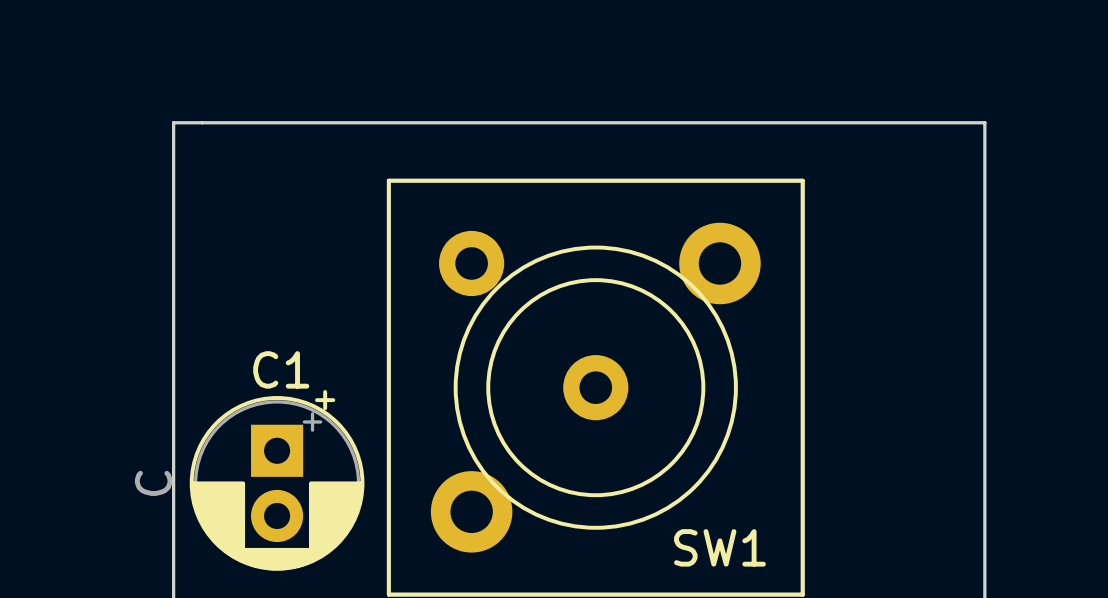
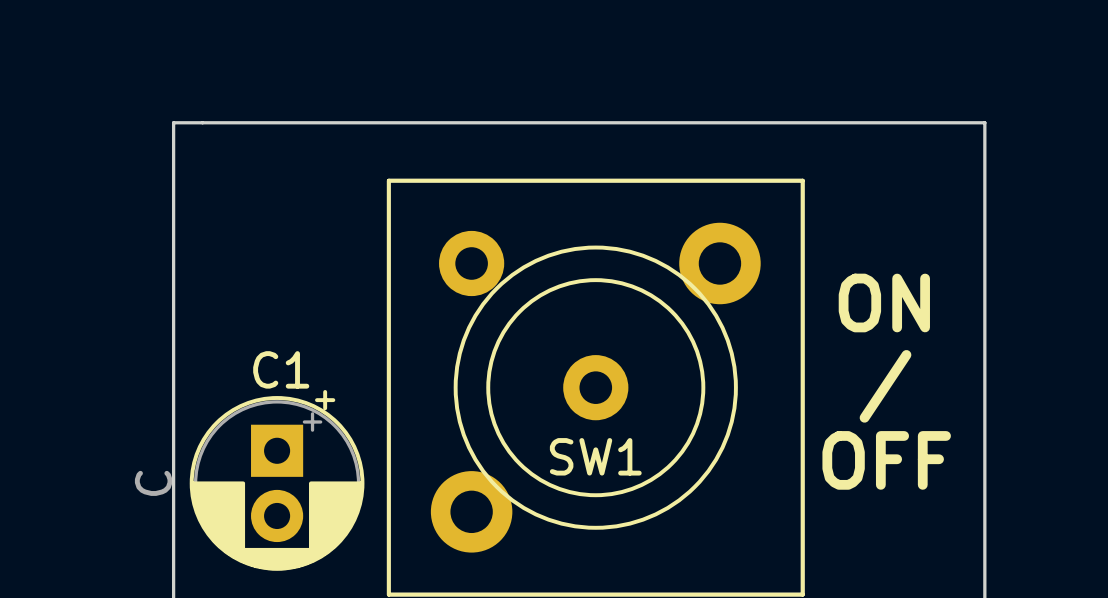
text: none -> ON (884, 302)
text: none -> / (885, 386)
text: none -> OFF (886, 460)
SW1 name position: SW1 (719, 547) -> SW1 (595, 456)

